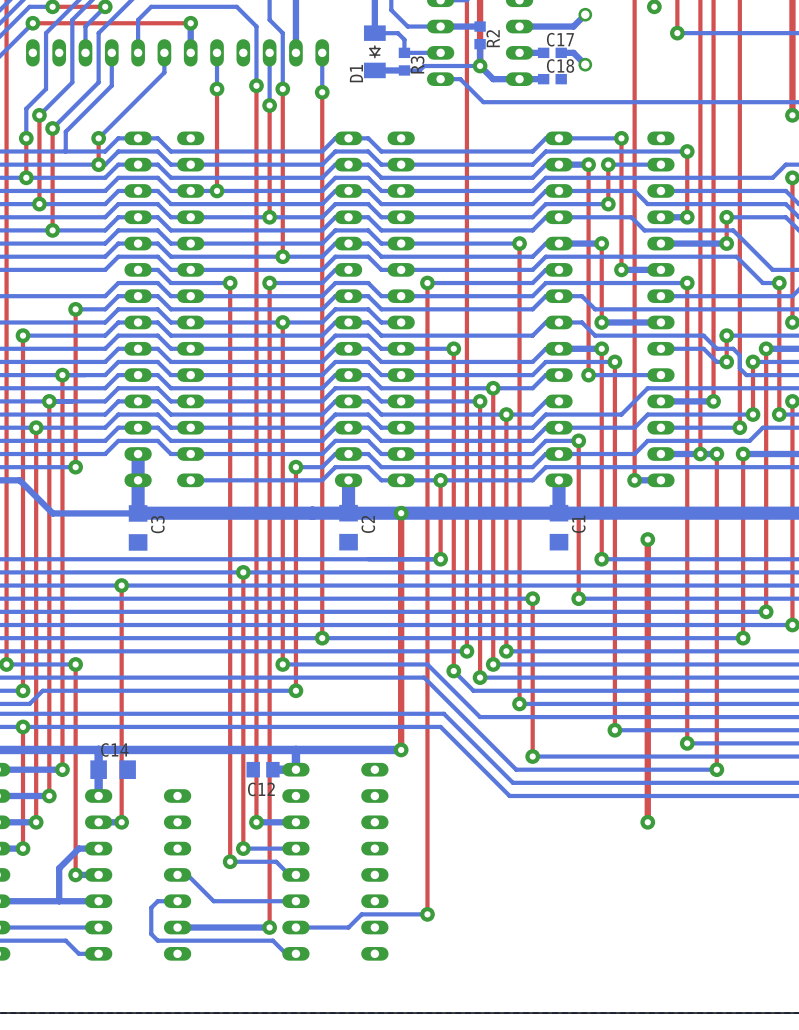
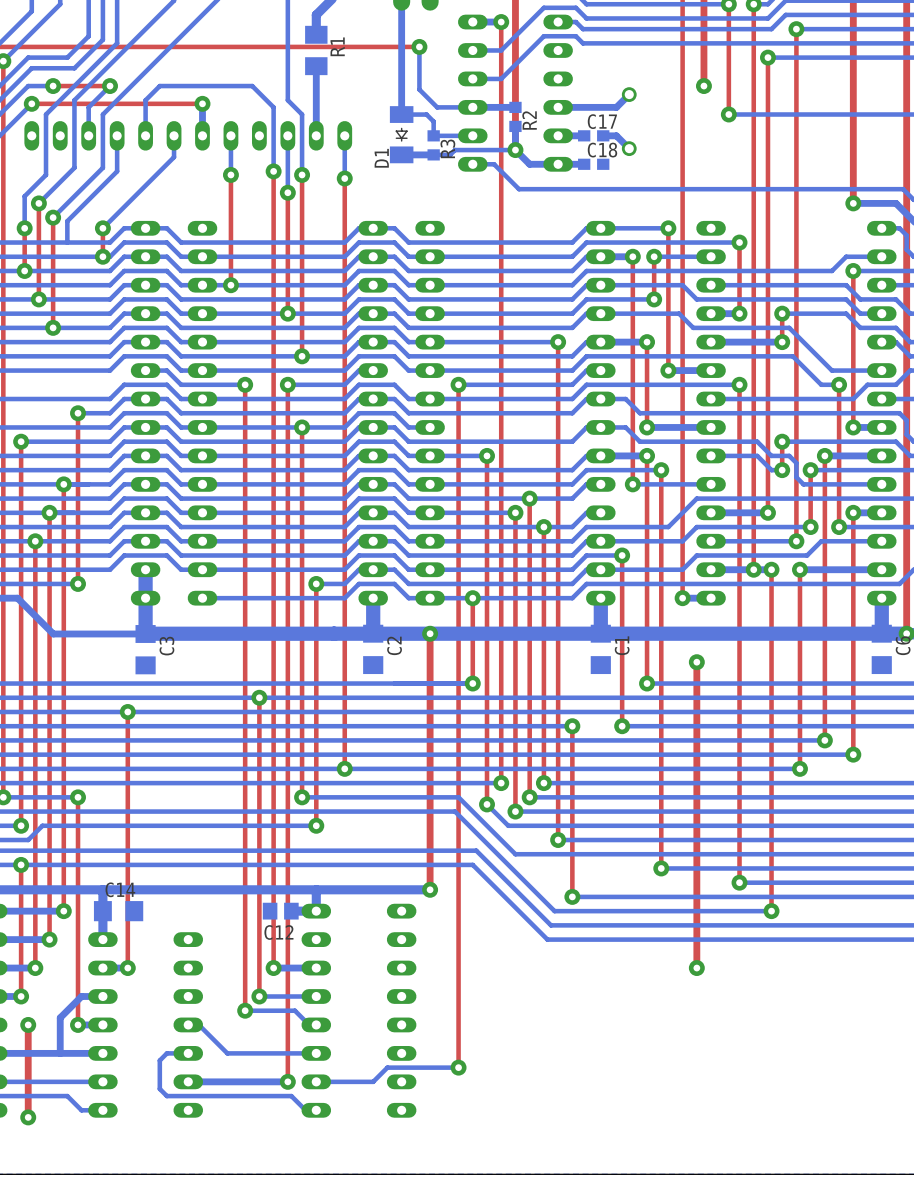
top track: none -> (28, 1024) (28, 1117)
via: none -> (28, 1024)
via: none -> (28, 1117)

